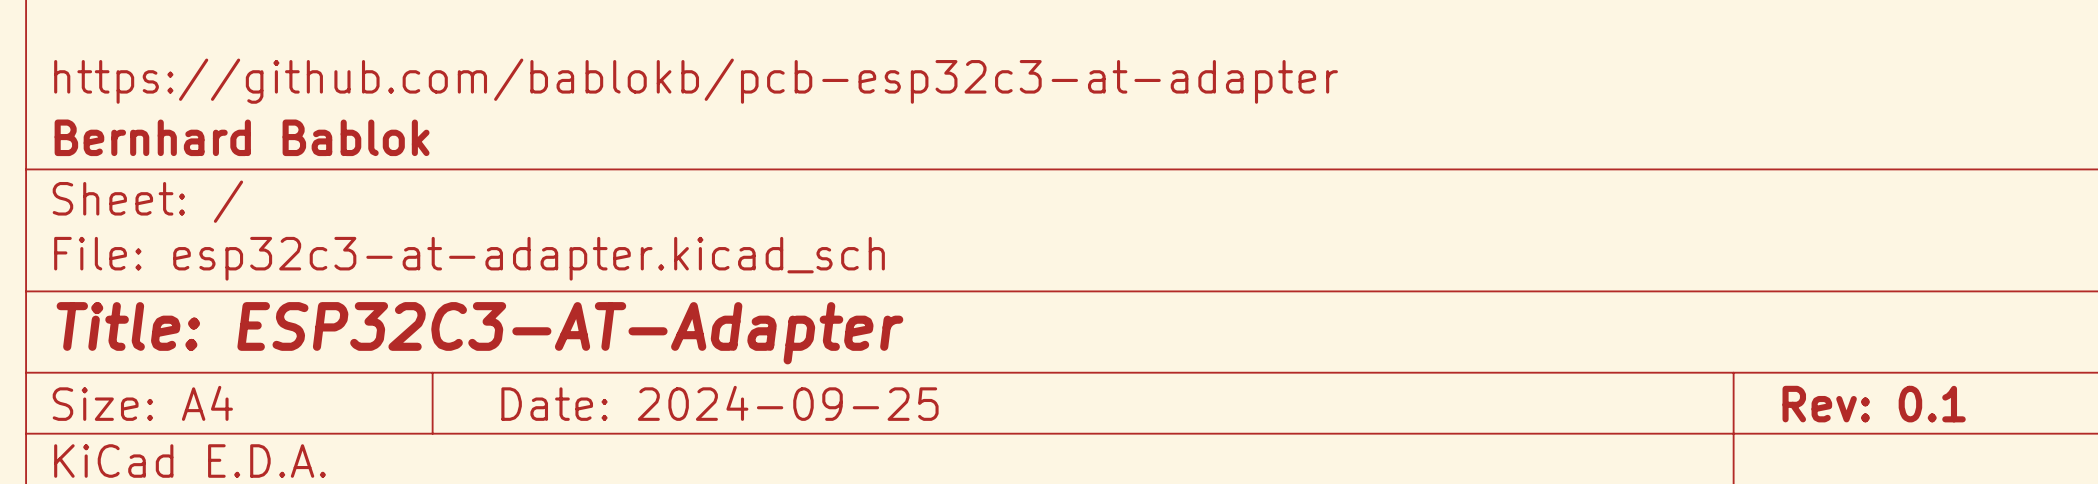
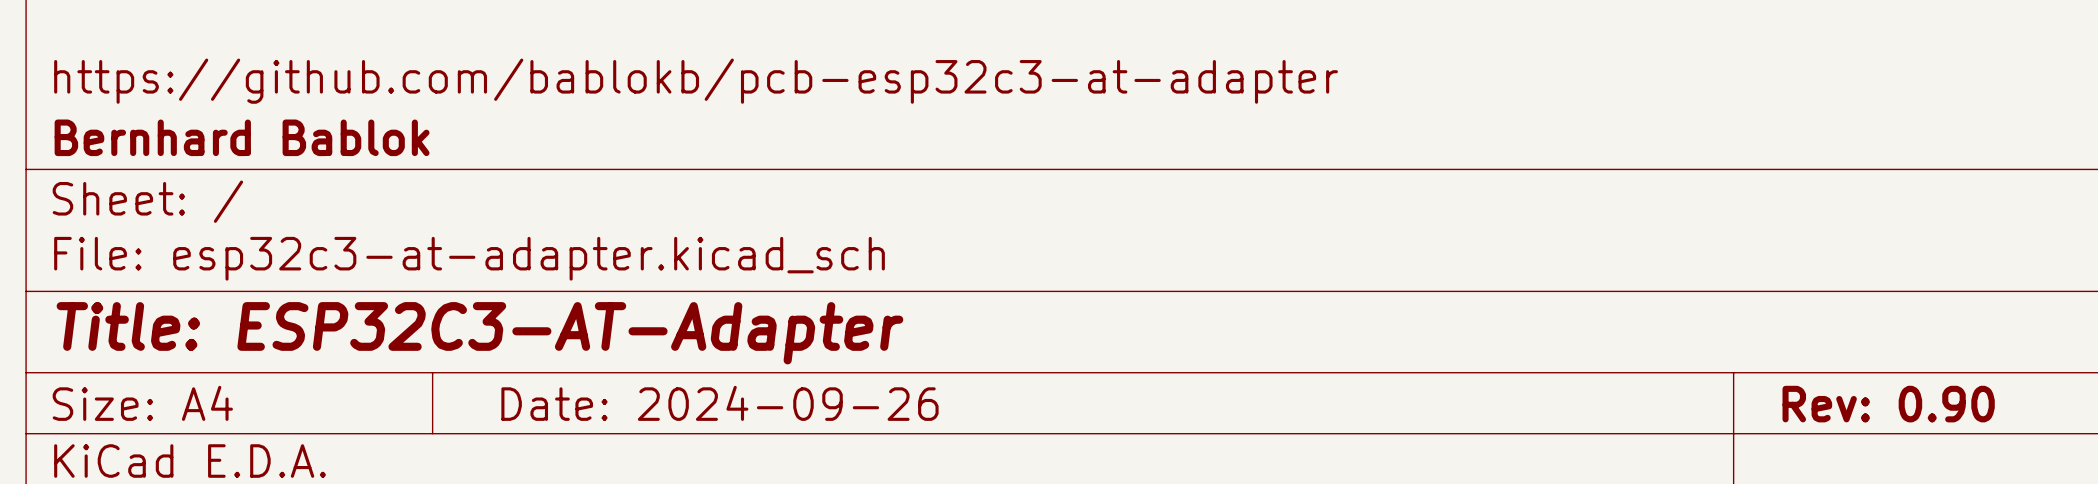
title block: Date: 2024-09-25 (719, 403) -> Date: 2024-09-26 (719, 403)
title block: Rev: 0.1 (1874, 404) -> Rev: 0.90 (1888, 404)

